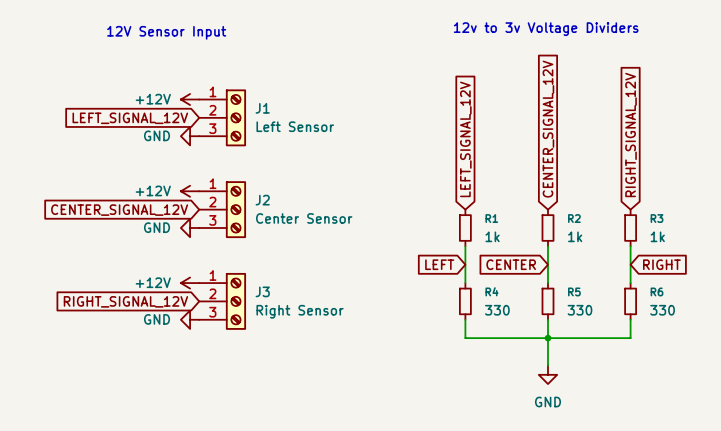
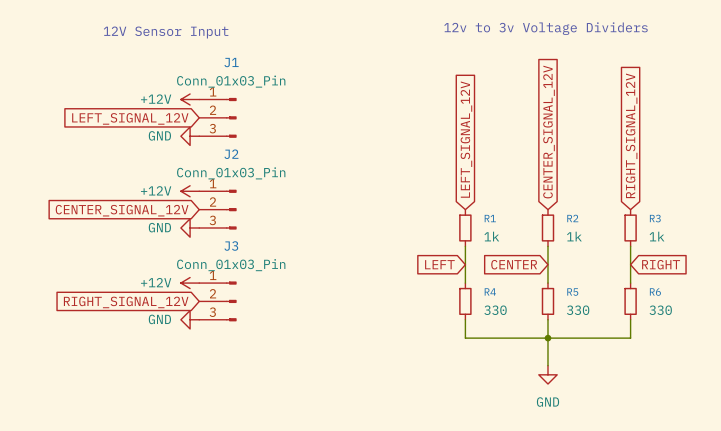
J1 symbol: [199, 89, 247, 147] -> [199, 98, 237, 138]
J1 name position: J1 (262, 108) -> J1 (231, 62)
J1 value: Left Sensor (295, 126) -> Conn_01x03_Pin (231, 81)
J2 symbol: [199, 181, 247, 239] -> [199, 189, 237, 230]
J2 name position: J2 (262, 200) -> J2 (231, 154)
J2 value: Center Sensor (304, 218) -> Conn_01x03_Pin (231, 173)
J3 symbol: [199, 272, 247, 330] -> [199, 281, 237, 322]
J3 name position: J3 (262, 291) -> J3 (231, 246)
J3 value: Right Sensor (300, 311) -> Conn_01x03_Pin (231, 265)

